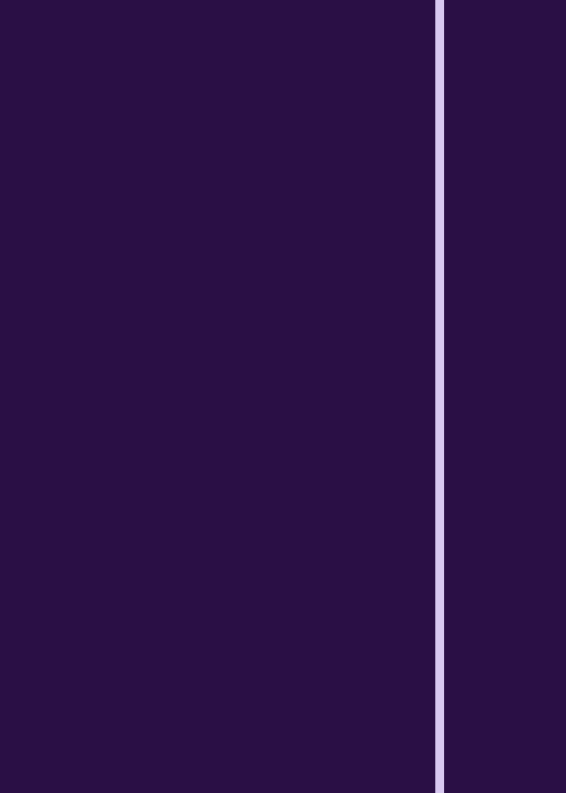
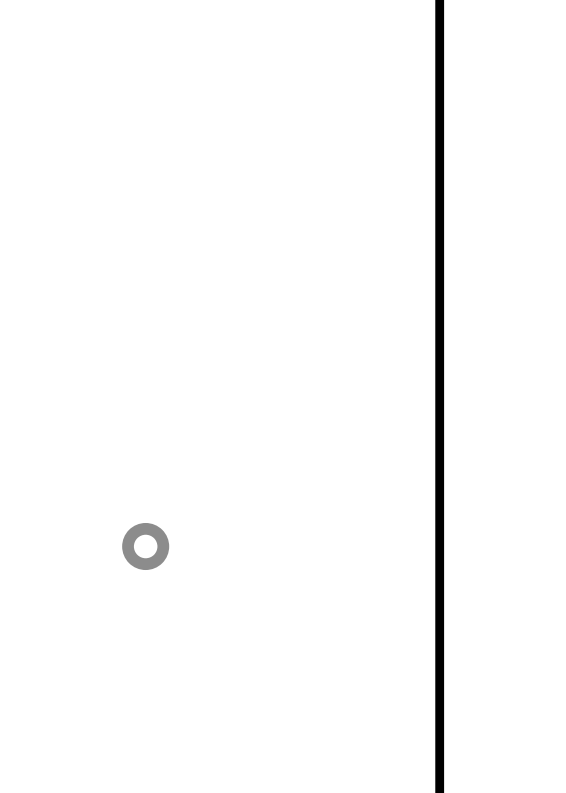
via: none -> (145, 546)

